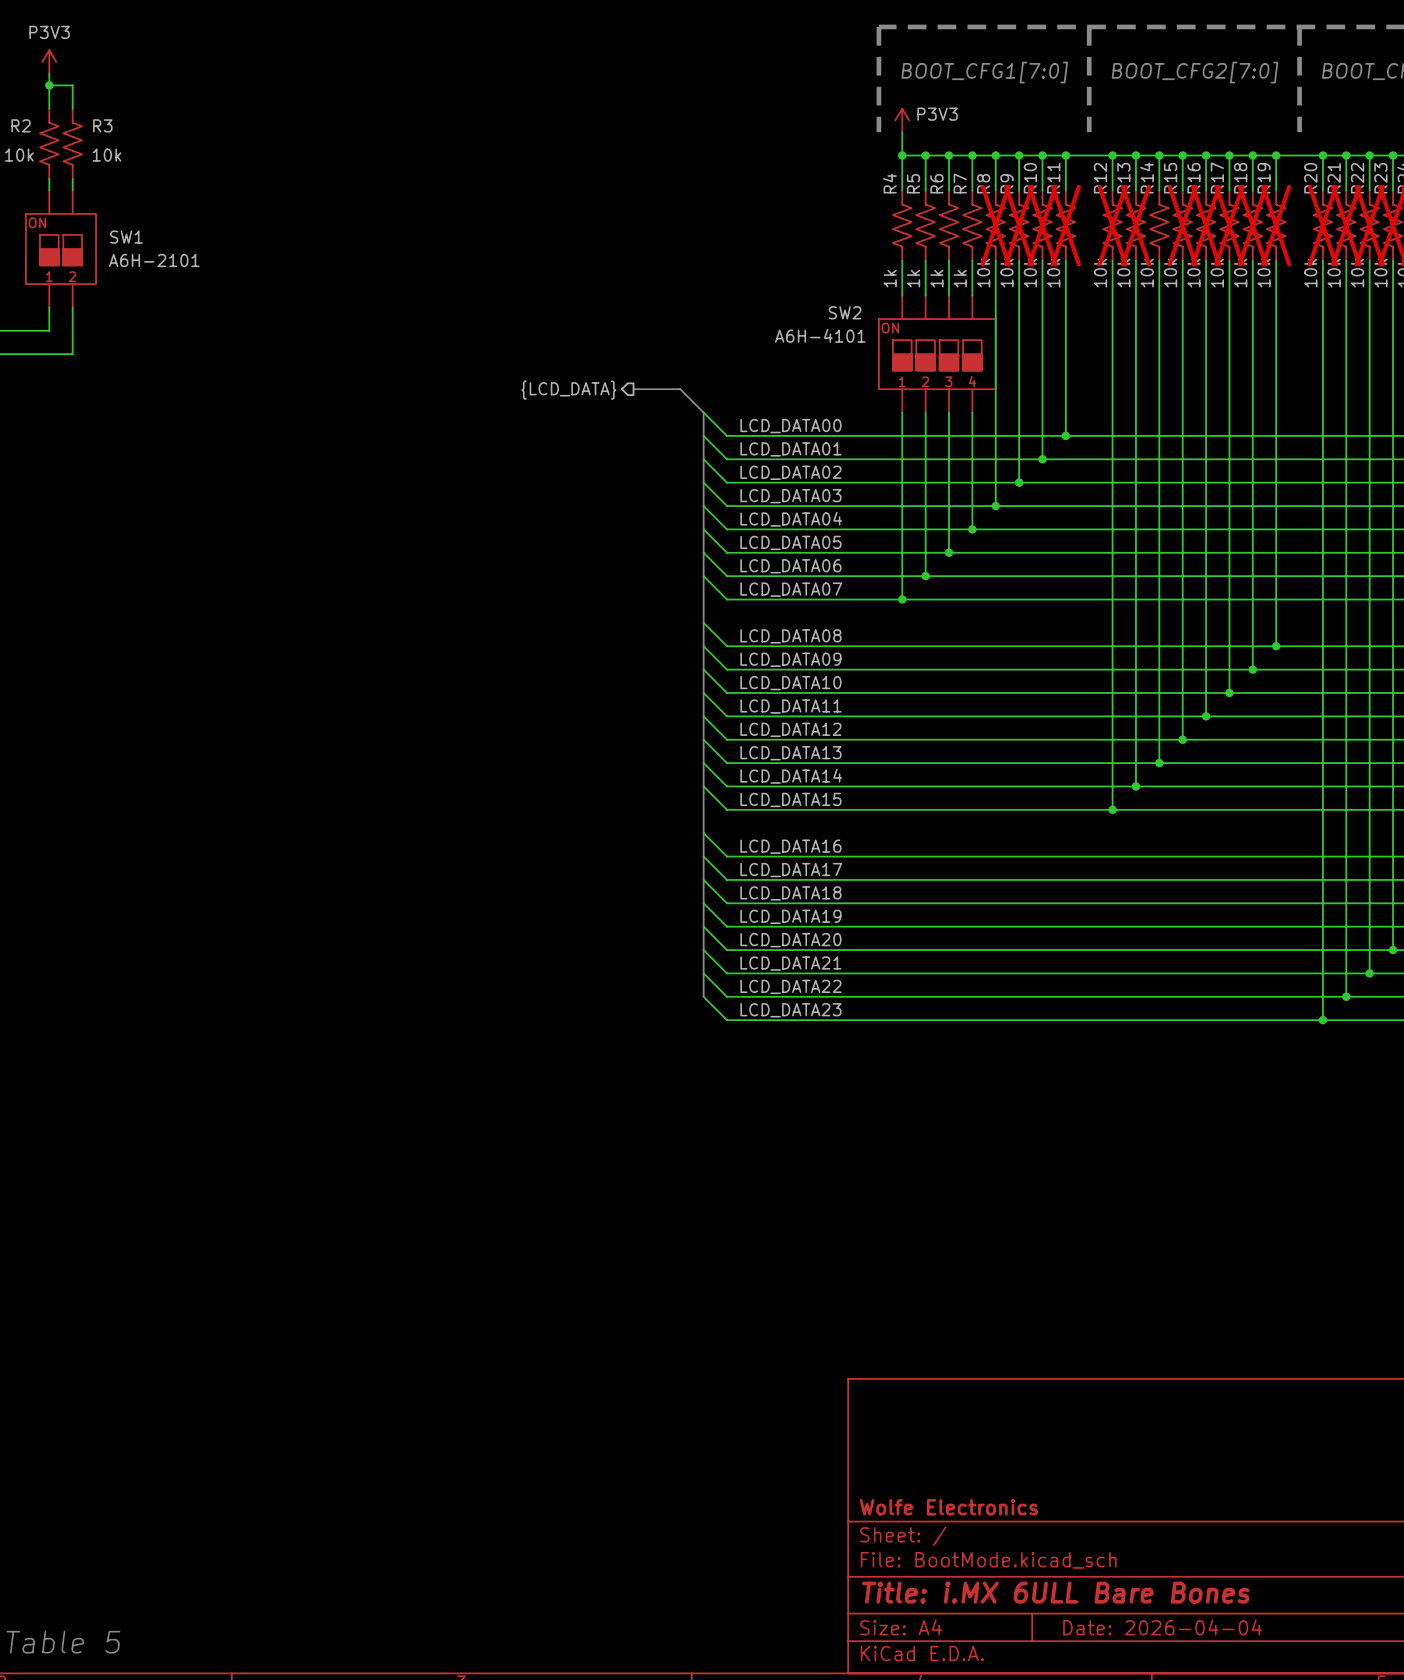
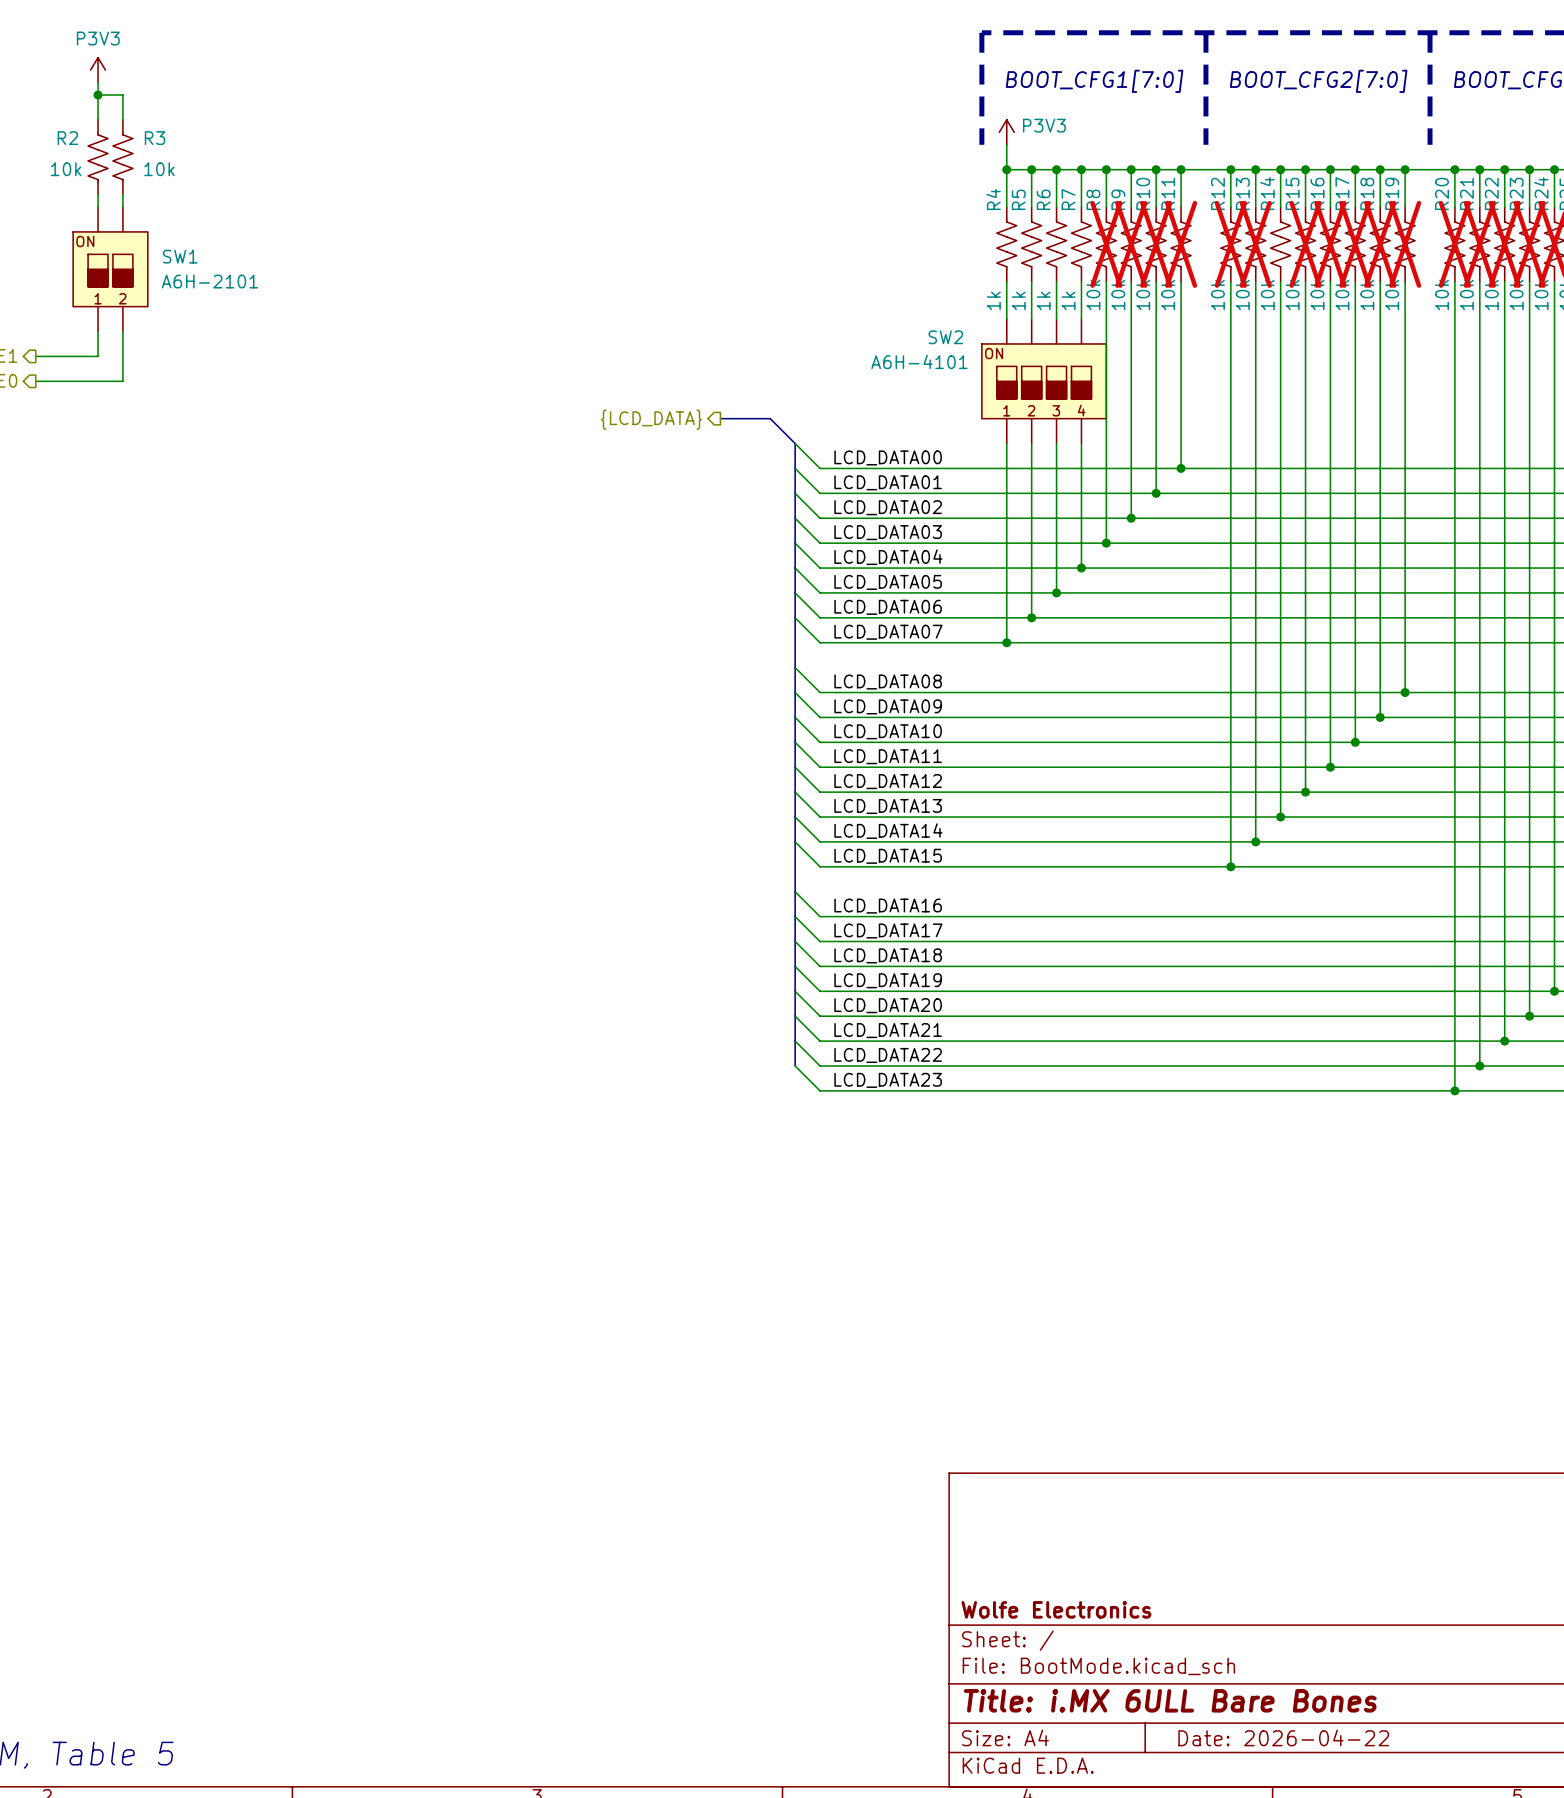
title block: Date: 2026-04-04 (1162, 1627) -> Date: 2026-04-22 (1283, 1737)

